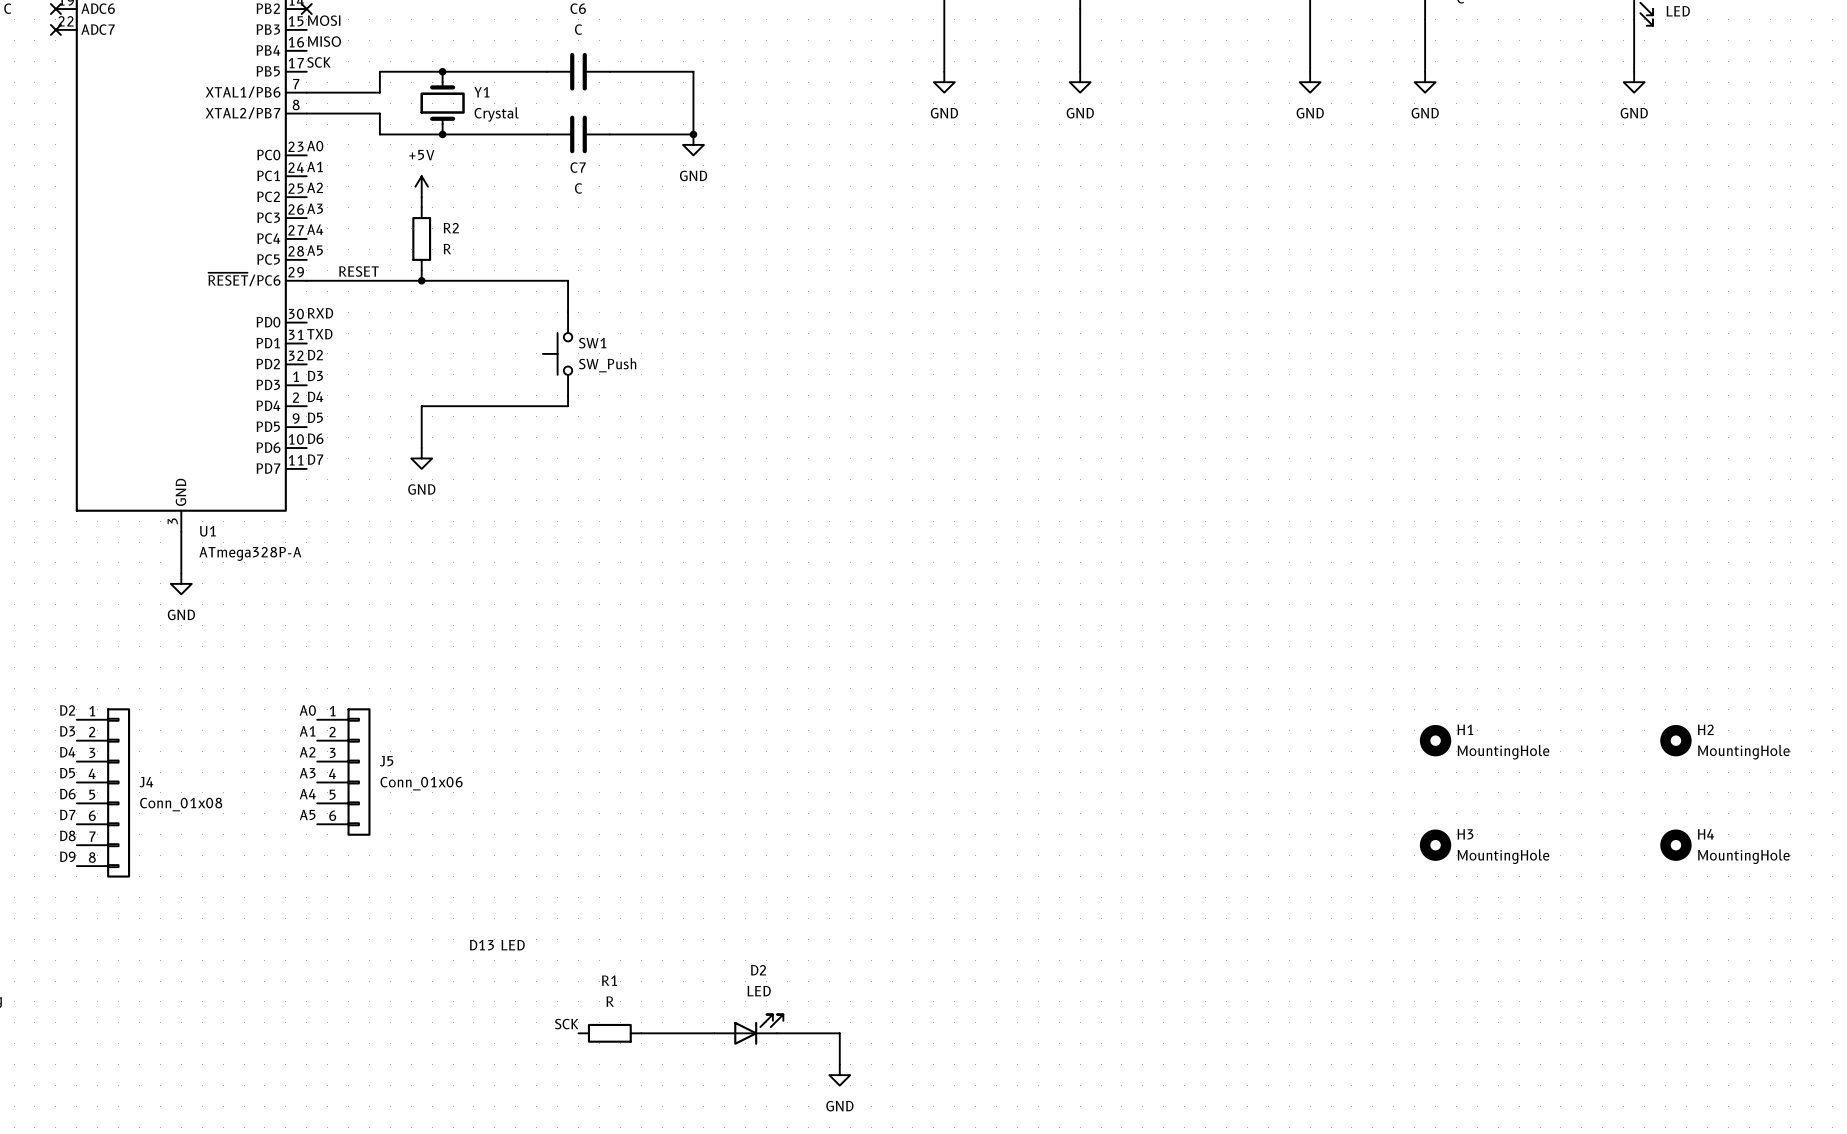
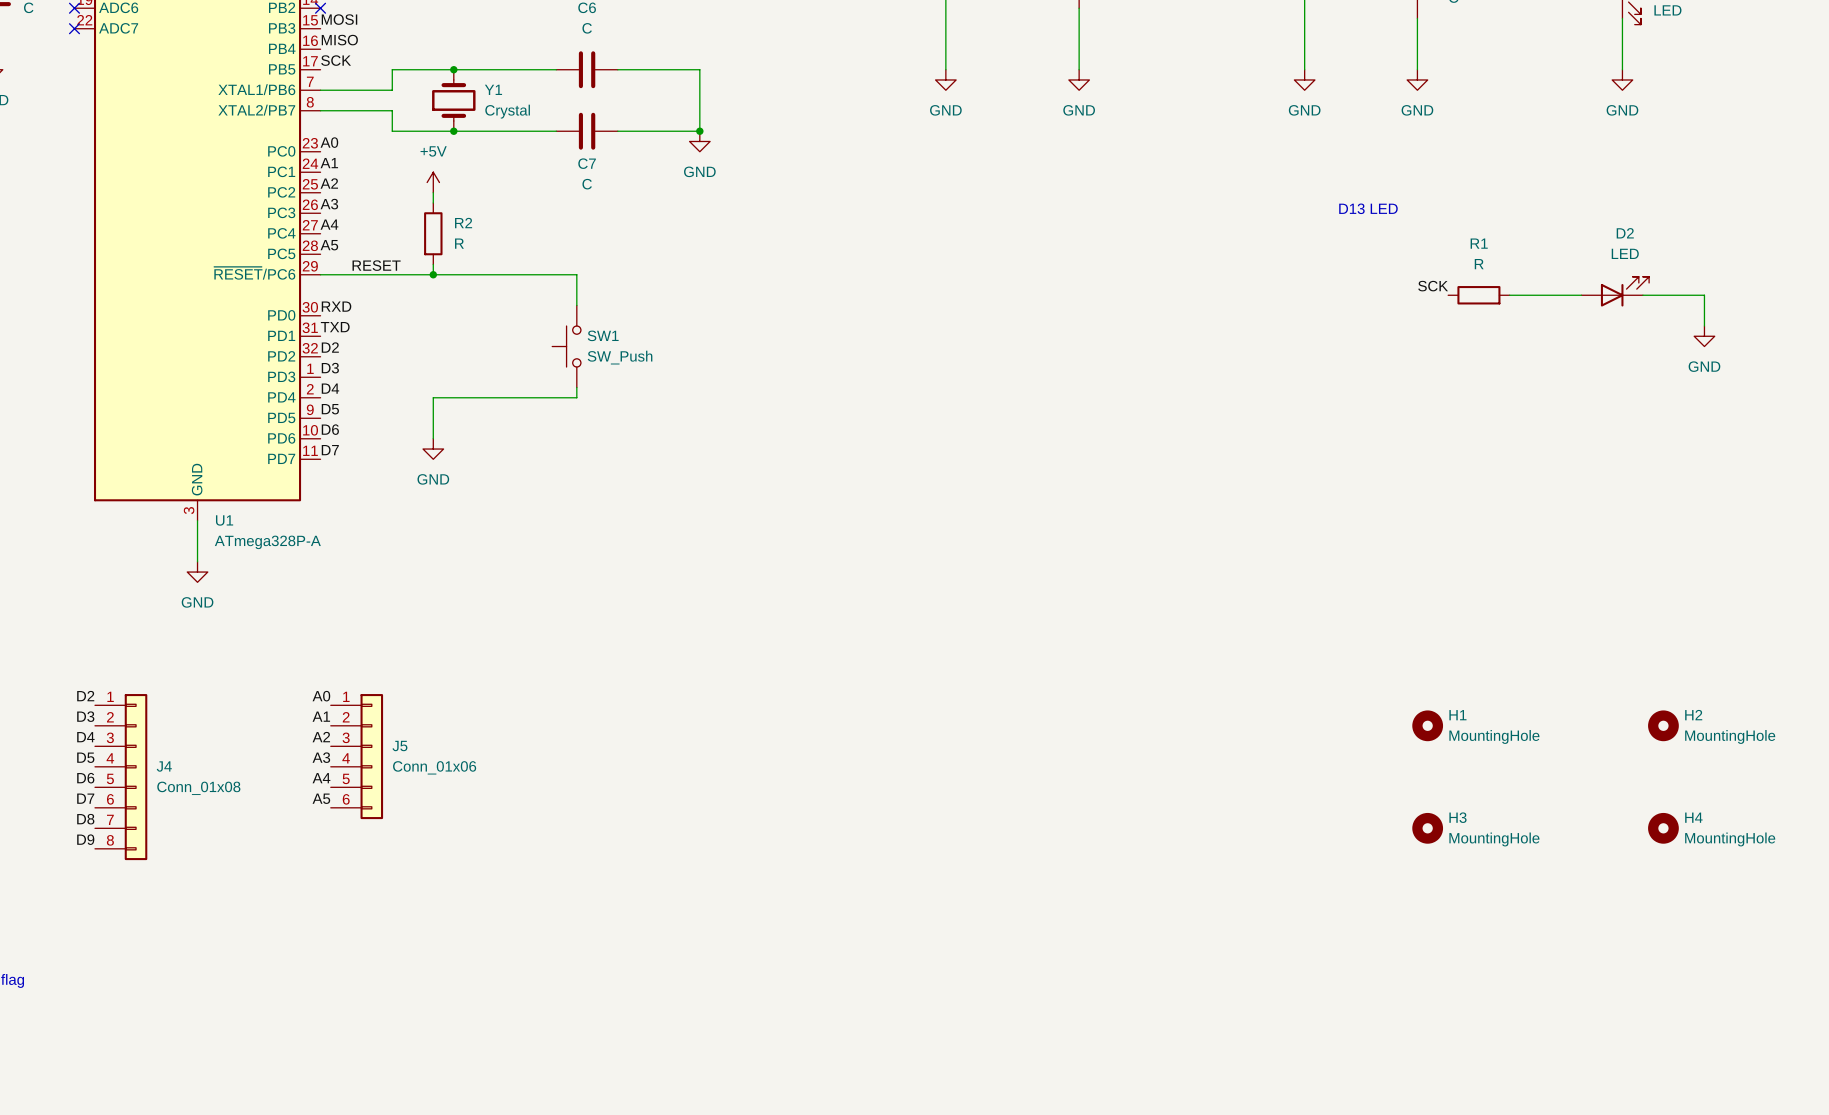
text: none -> D13 LED (1368, 208)
label: none -> SCK (1433, 286)
wire: none -> (1509, 295) (1581, 295)
wire: none -> (1642, 295) (1704, 295) (1704, 326)
power symbol: none -> GND (1704, 336)
text: D13 LED (497, 945) -> none
label: SCK (566, 1024) -> none
D2 position: (748, 1029) -> (1615, 291)
R1 position: (609, 1033) -> (1478, 295)
wire: (641, 1033) (714, 1033) -> none
wire: (777, 1033) (839, 1033) (839, 1064) -> none
power symbol: GND (839, 1075) -> none

